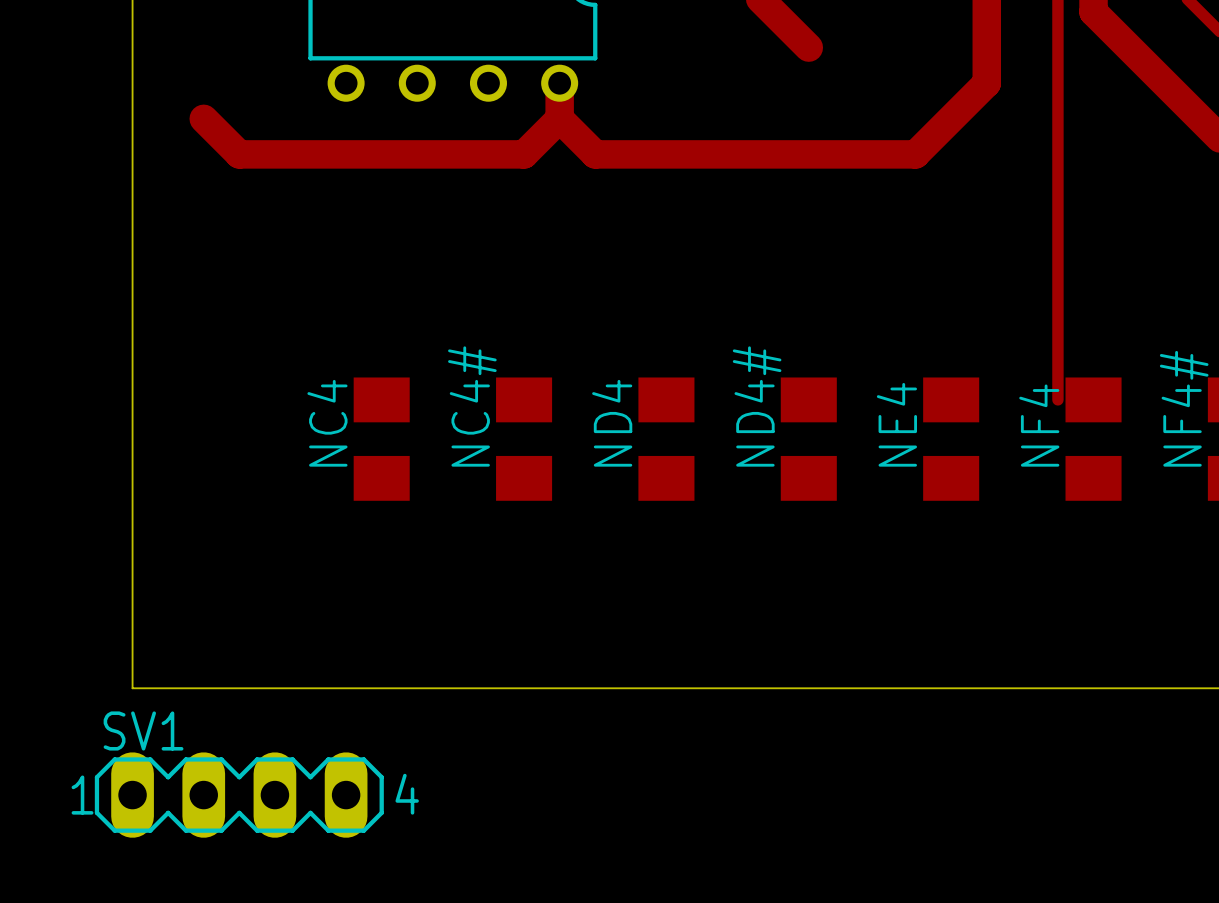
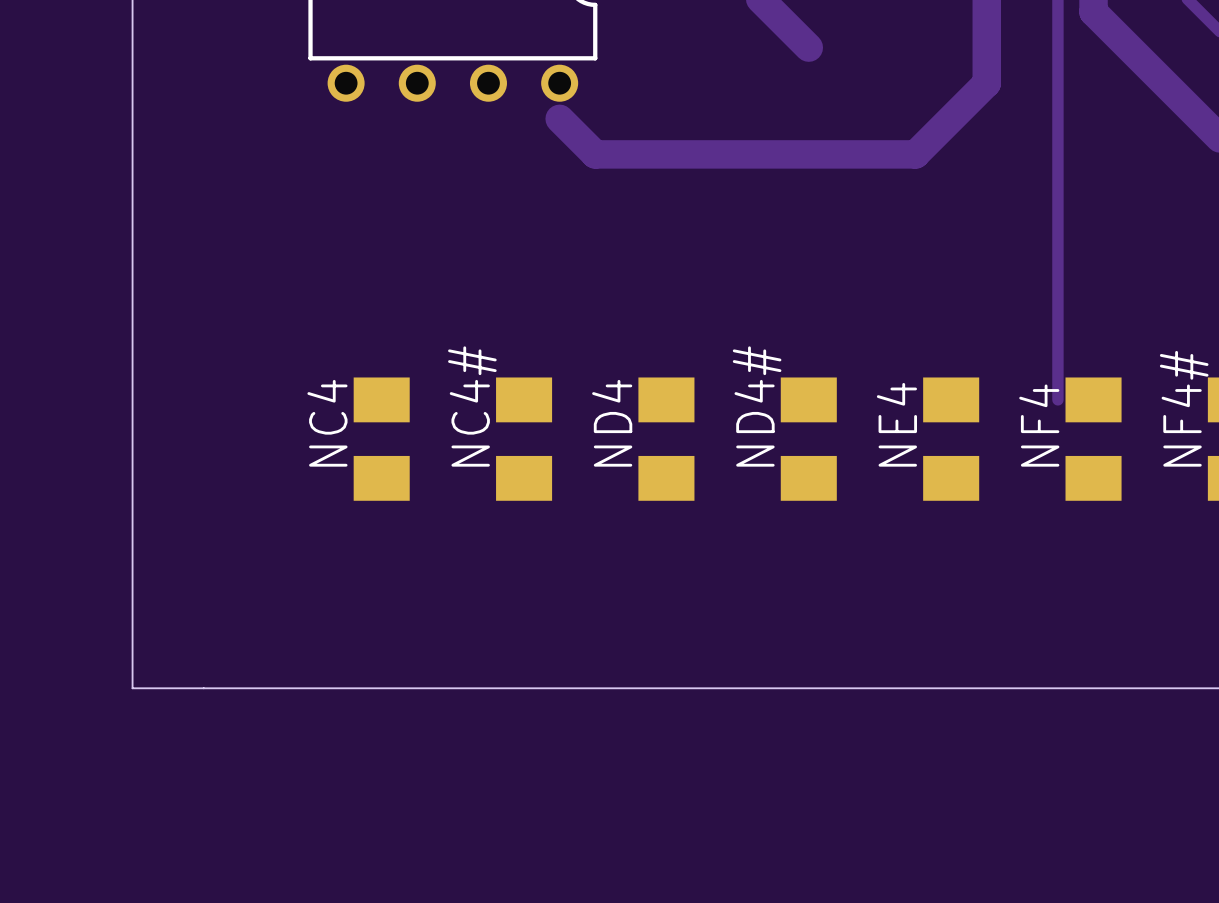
track: (559, 83) (559, 118) (524, 154) (239, 154) (203, 118) -> none
SV1: (239, 795) -> none

